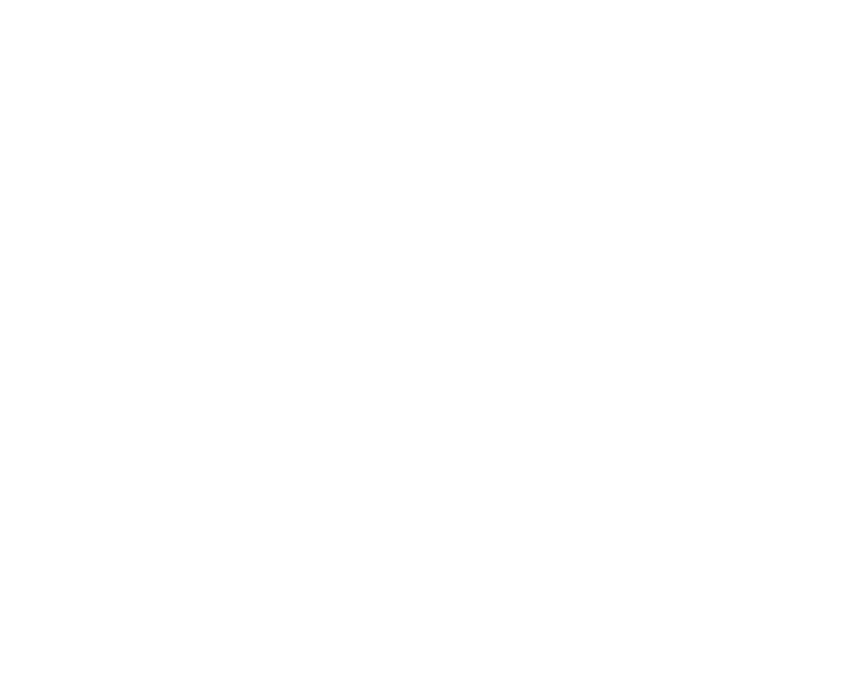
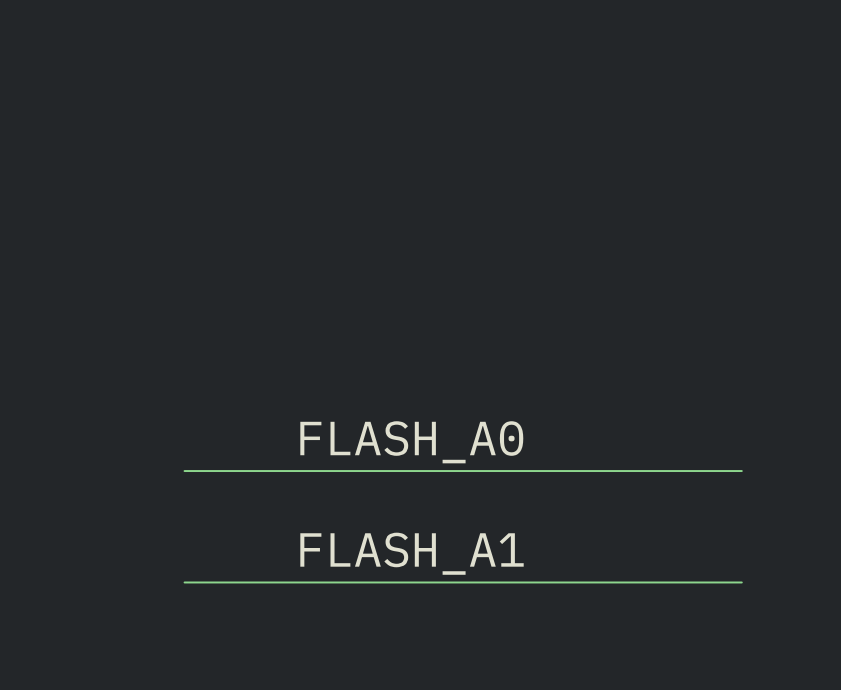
label: none -> FLASH_A0 (411, 442)
wire: none -> (184, 471) (741, 471)
label: none -> FLASH_A1 (412, 553)
wire: none -> (184, 582) (741, 582)

